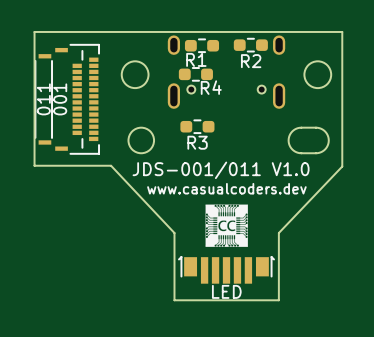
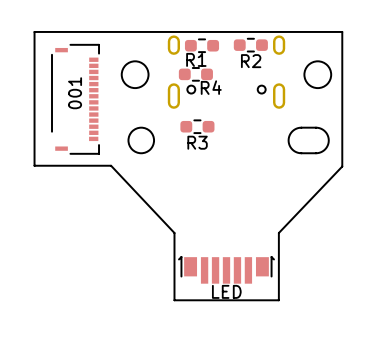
part footprint: [51, 44, 100, 155] -> [51, 44, 100, 155]
011: (58, 99) -> none
text: JDS-001/011 V1.0 (221, 170) -> none
text: www.casualcoders.dev (226, 188) -> none
drawing: [205, 204, 248, 247] -> none

